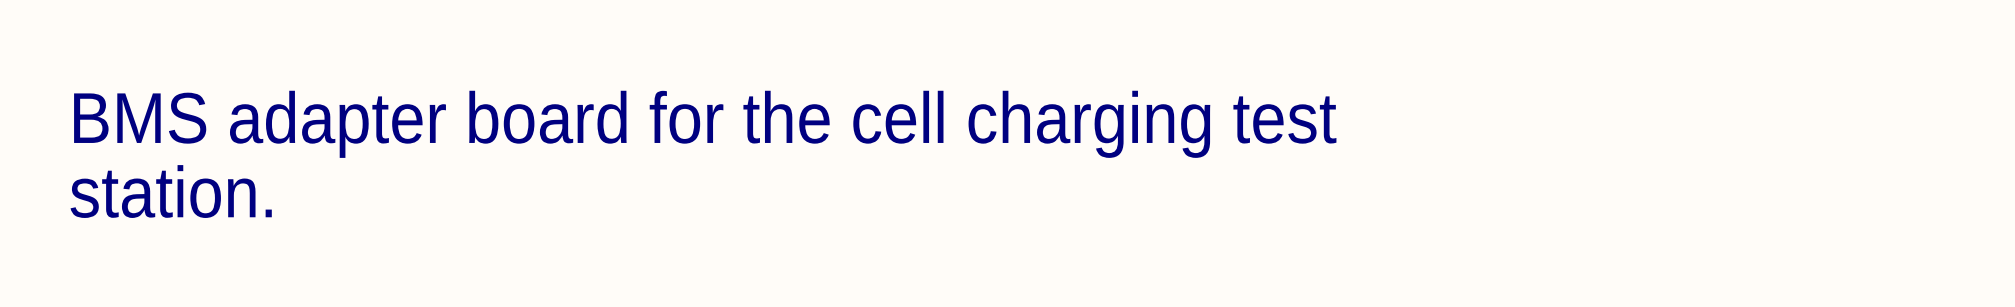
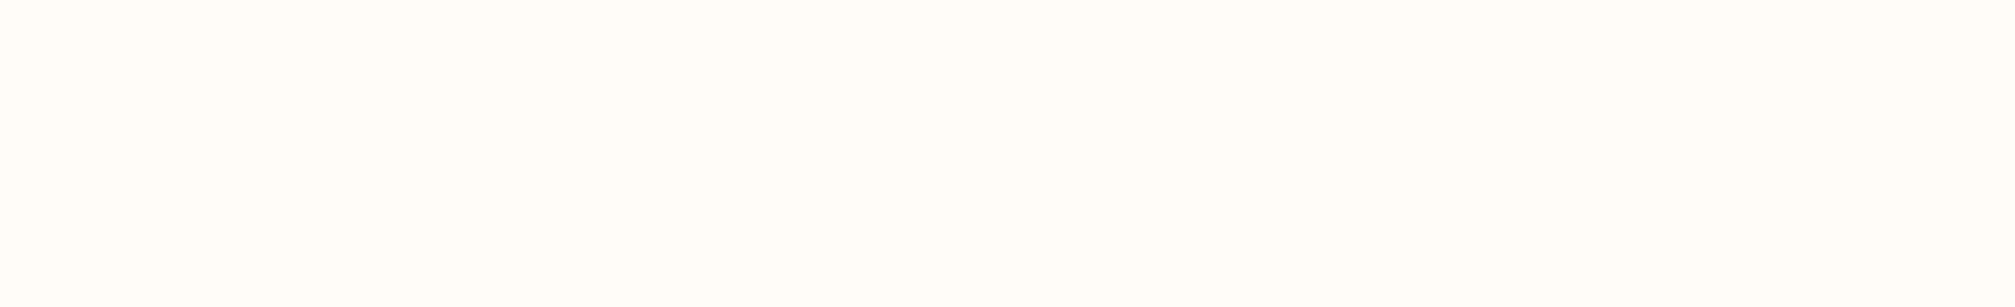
text: BMS adapter board for the cell charging test (705, 124) -> none
text: station. (171, 191) -> none

